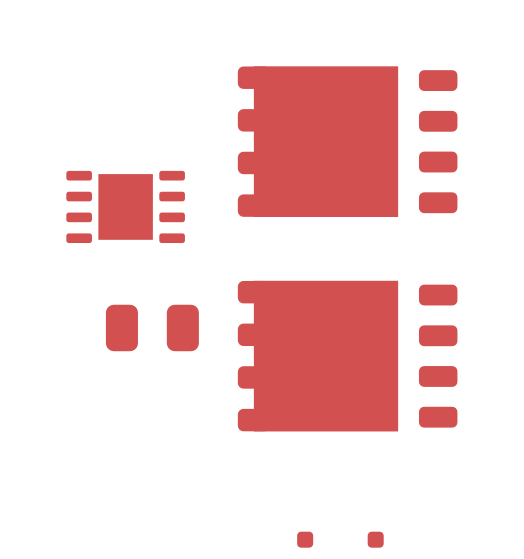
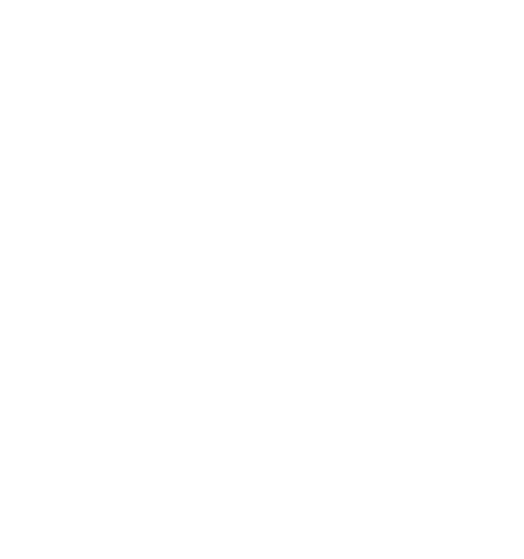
part: (347, 141) -> none
part: (125, 206) -> none
part: (152, 327) -> none
part: (347, 356) -> none
part: (340, 539) -> none

